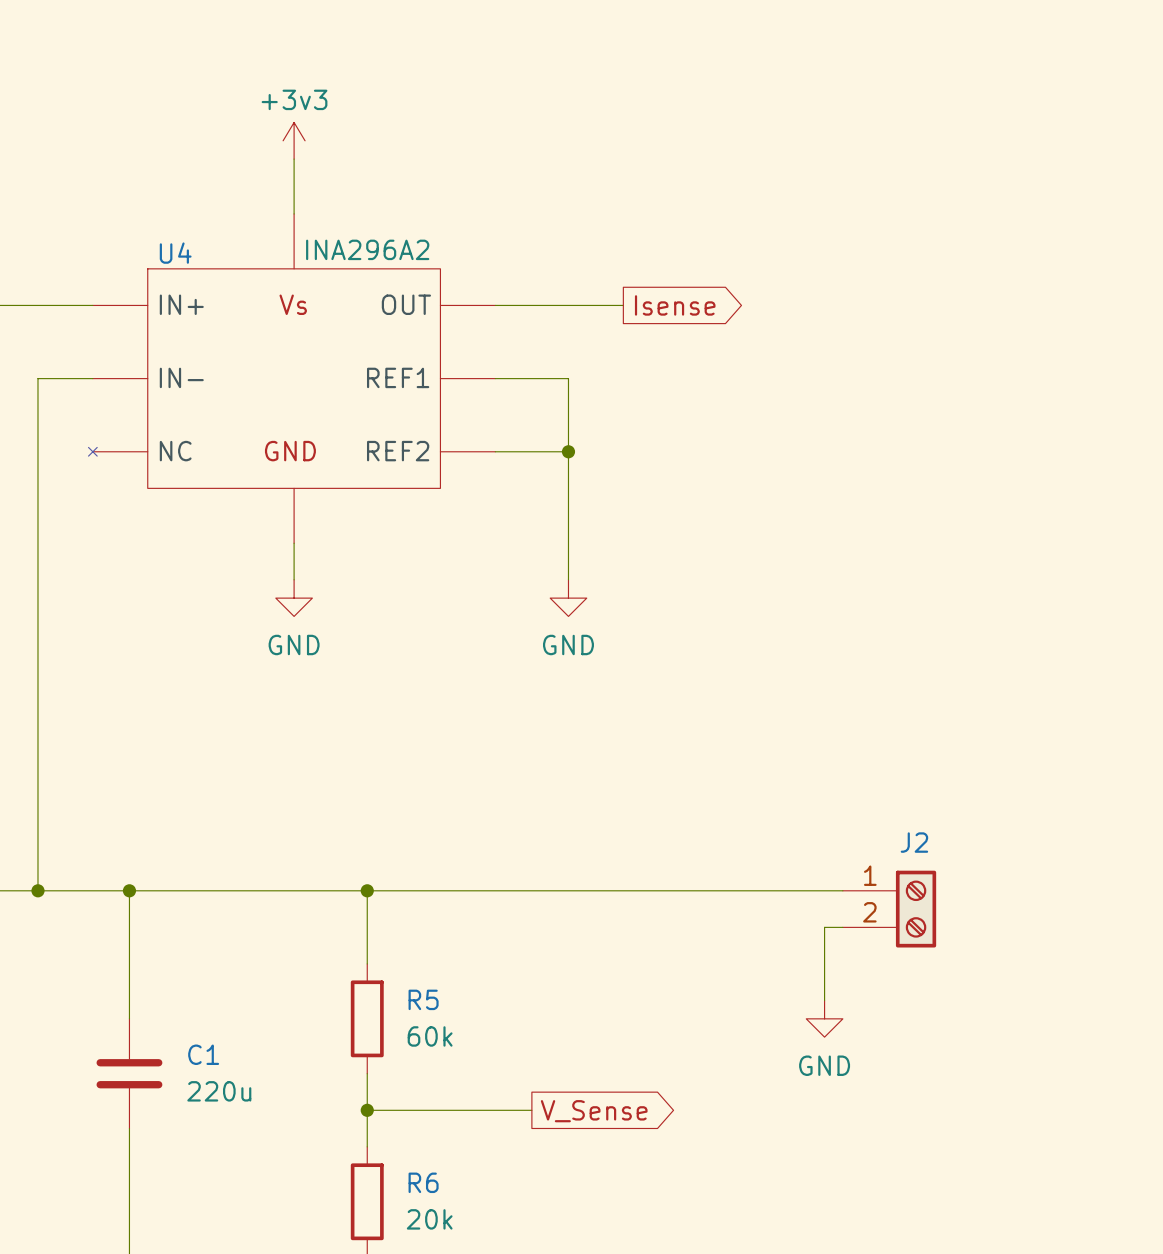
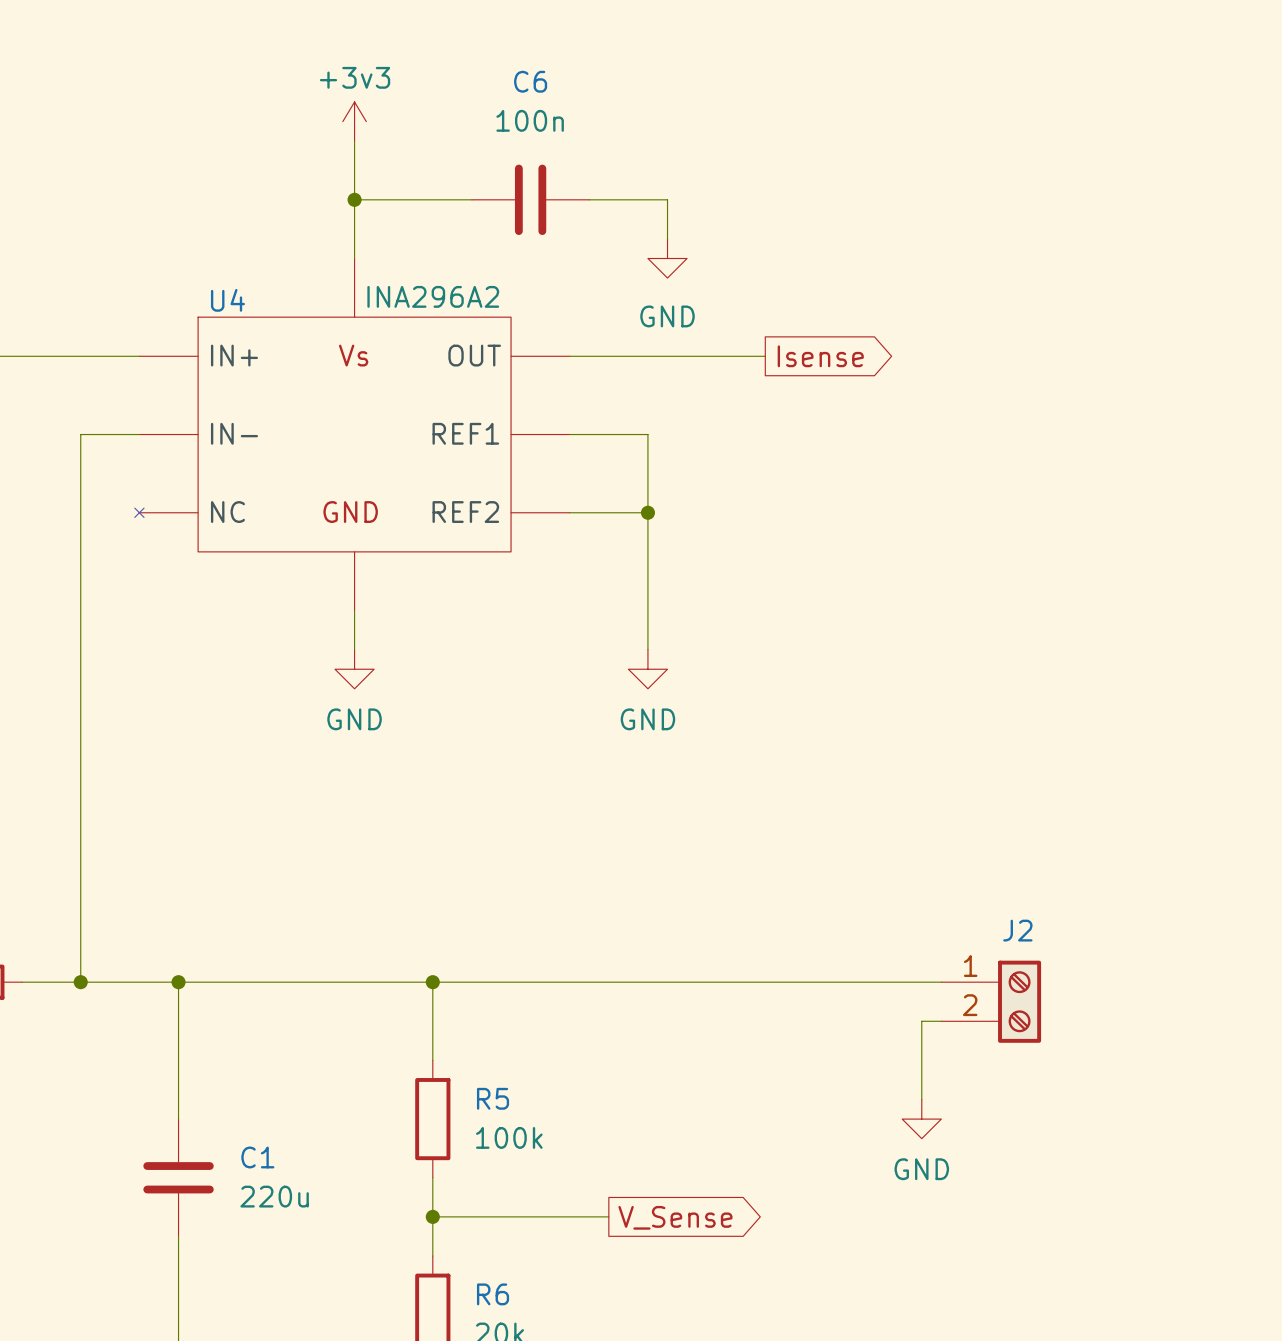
wire: none -> (354, 141) (354, 199) (471, 199)
power symbol position: +3v3 (294, 140) -> +3v3 (354, 121)
junction: none -> (354, 199)
C6: none -> 100n (530, 199)
wire: none -> (589, 199) (667, 199) (667, 238)
power symbol: none -> GND (667, 258)
wire: none -> (706, 356) (765, 356)
global label position: Isense (675, 305) -> Isense (820, 356)
R5 value: 60k (430, 1036) -> 100k (509, 1137)

